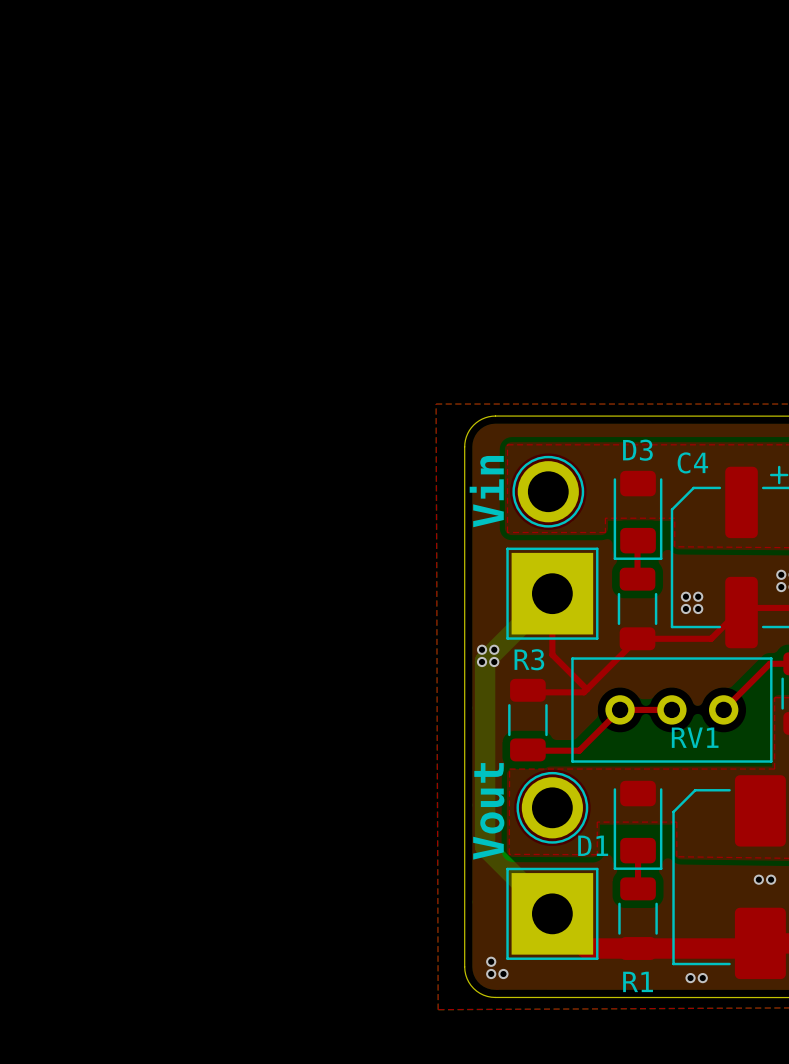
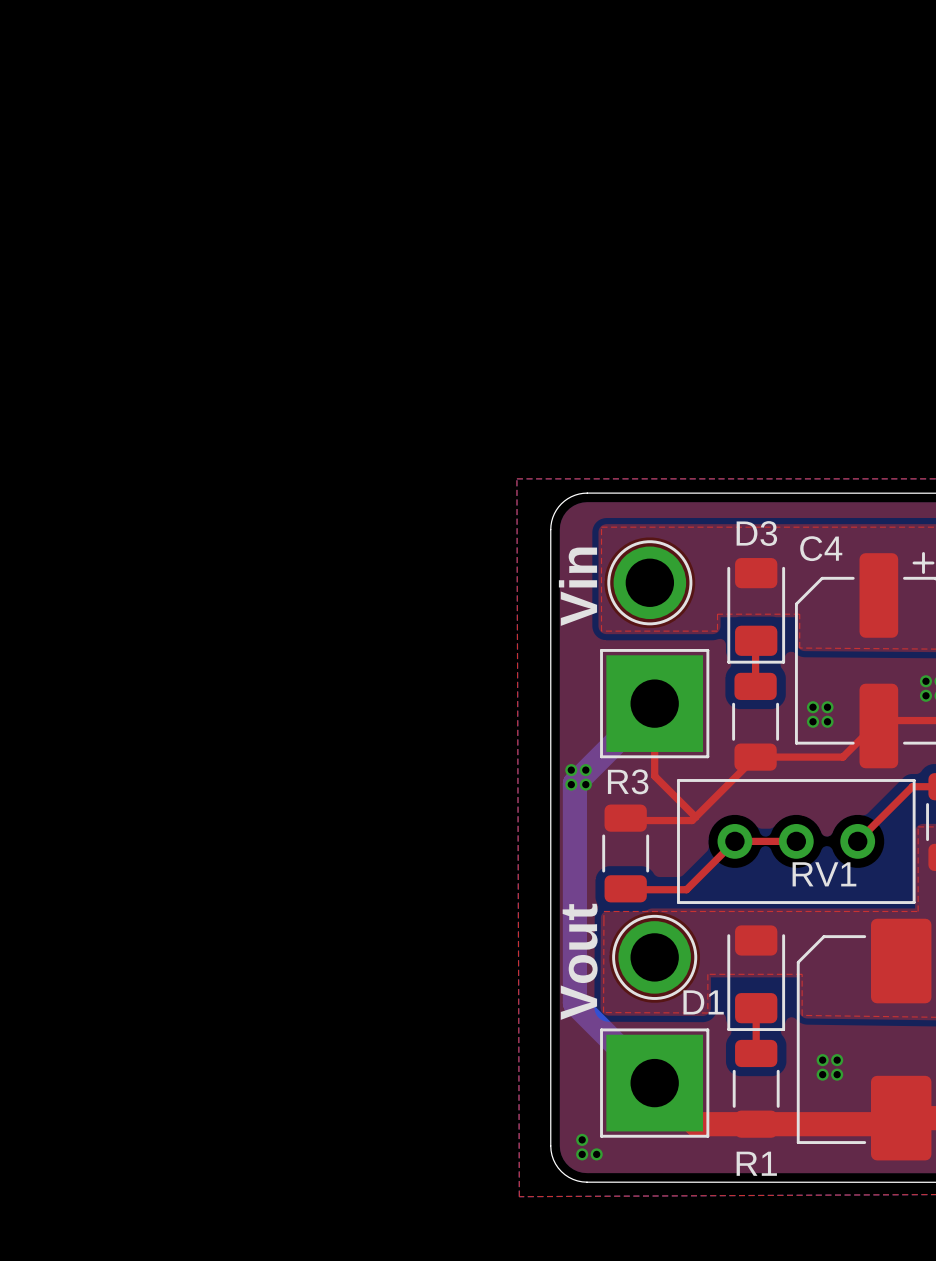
via: (758, 879) -> none
via: (771, 879) -> none
via: none -> (822, 1060)
via: none -> (837, 1060)
via: none -> (822, 1074)
via: none -> (837, 1074)
via: (690, 978) -> none
via: (702, 978) -> none

